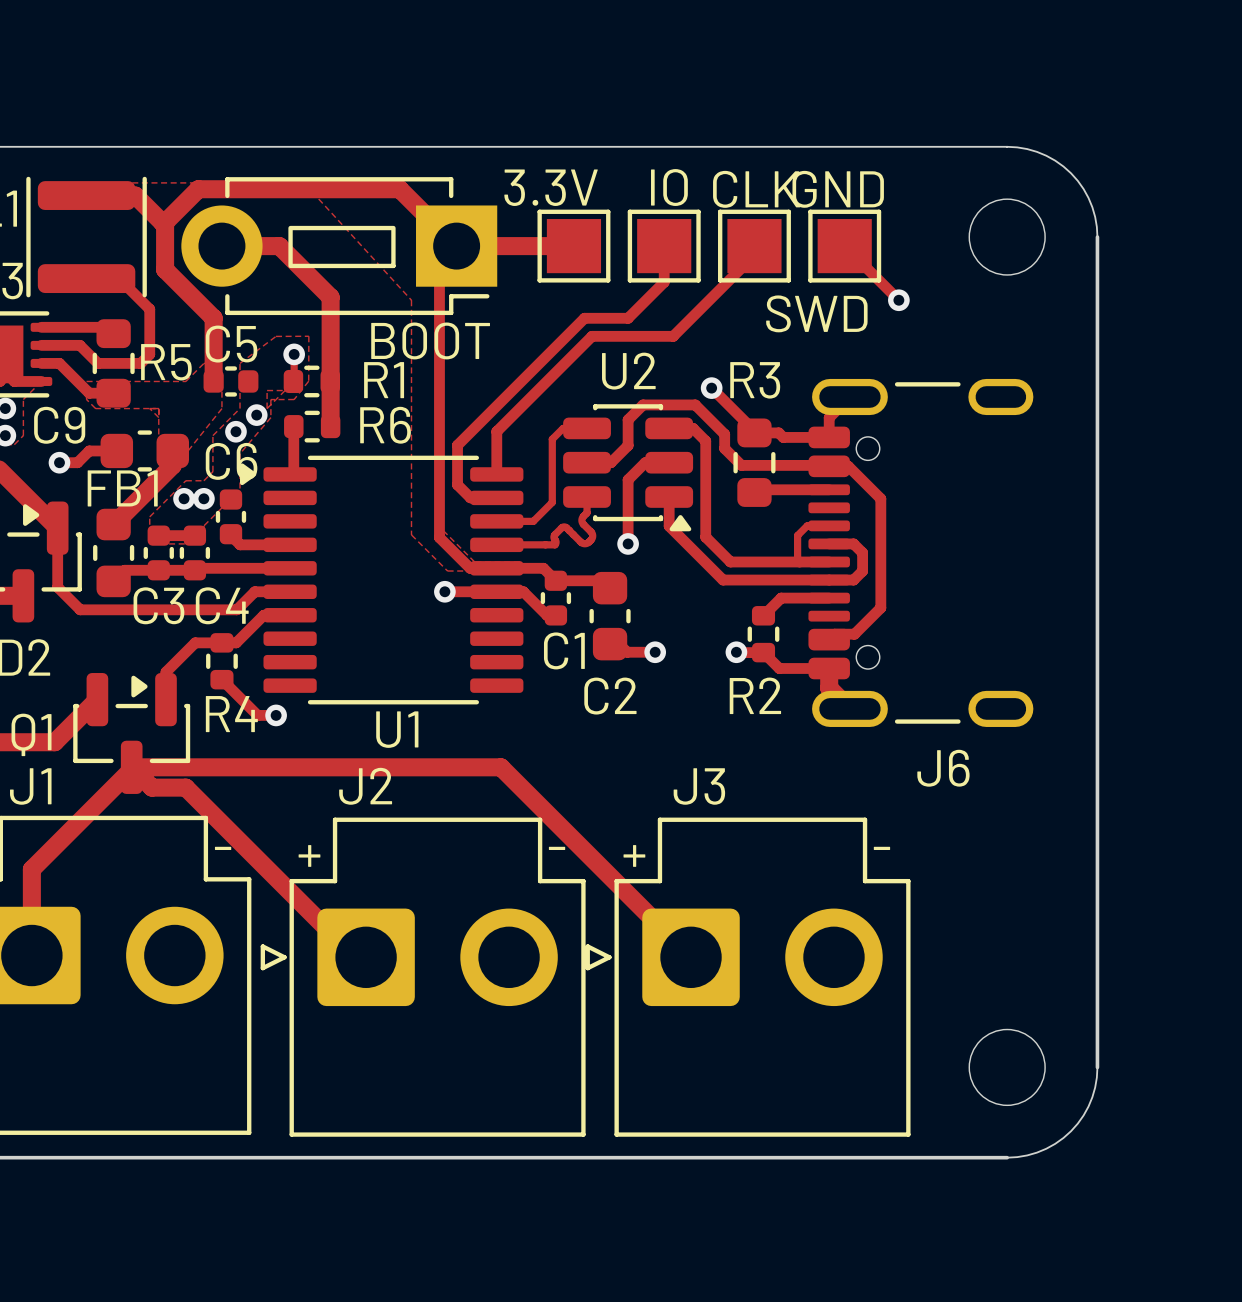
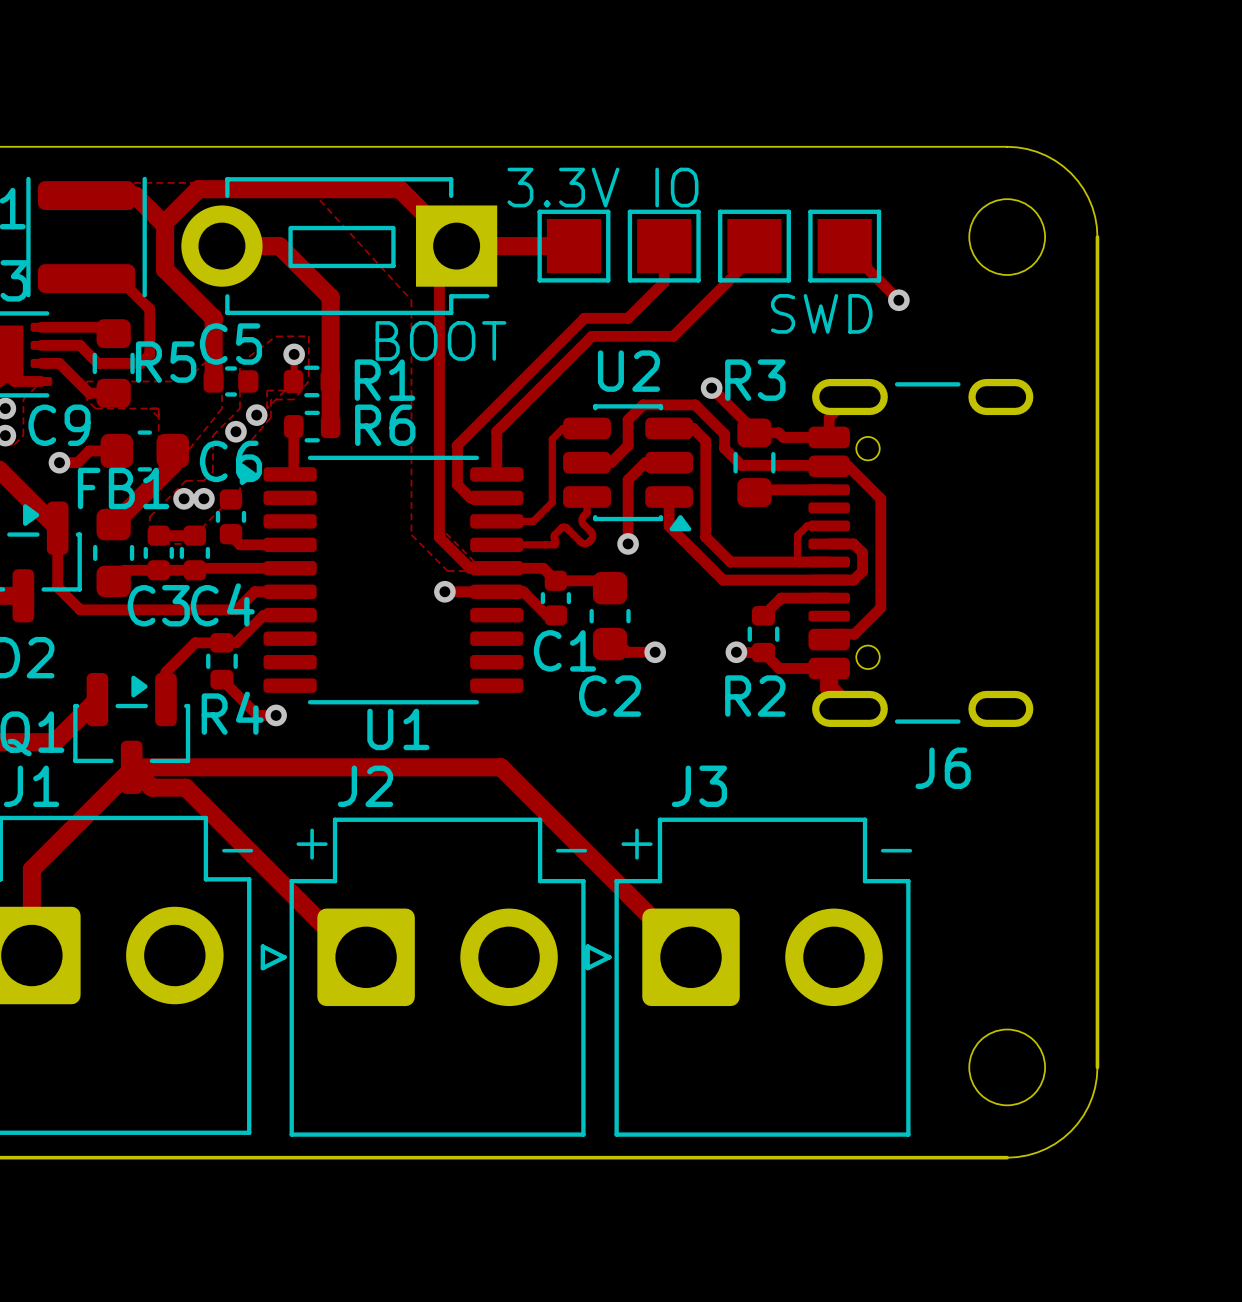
text: CLK (756, 189) -> none
text: GND (838, 189) -> none

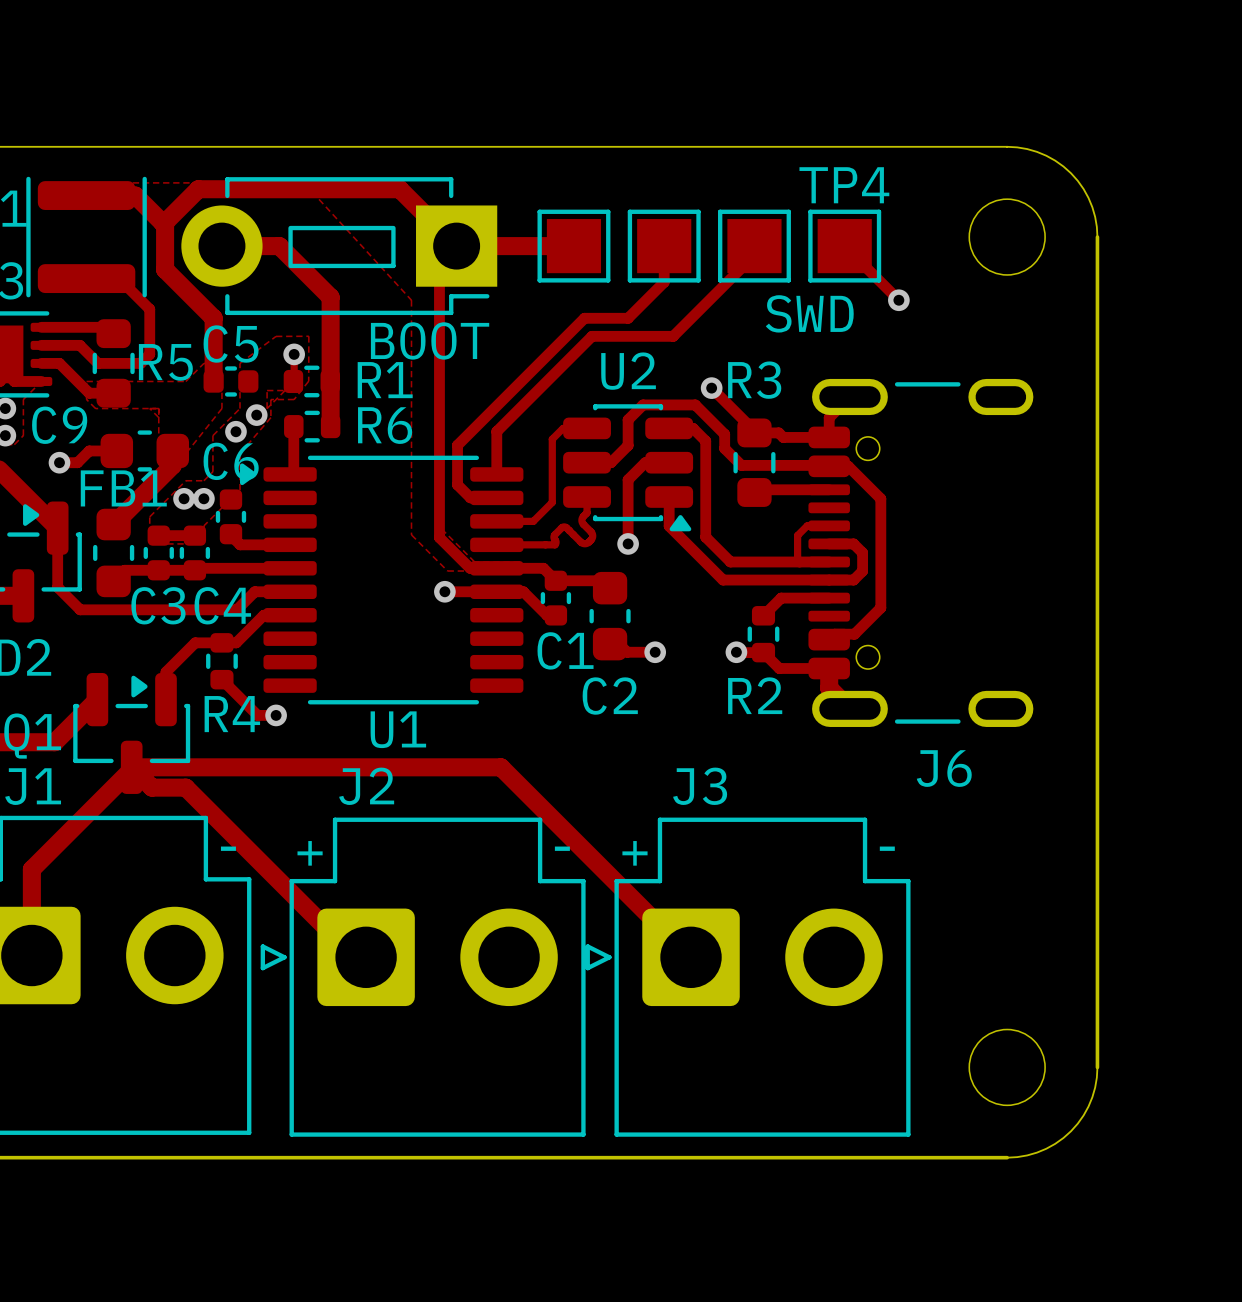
TP4 name: none -> TP4 (844, 185)
text: 3.3V (563, 187) -> none
text: IO (676, 187) -> none

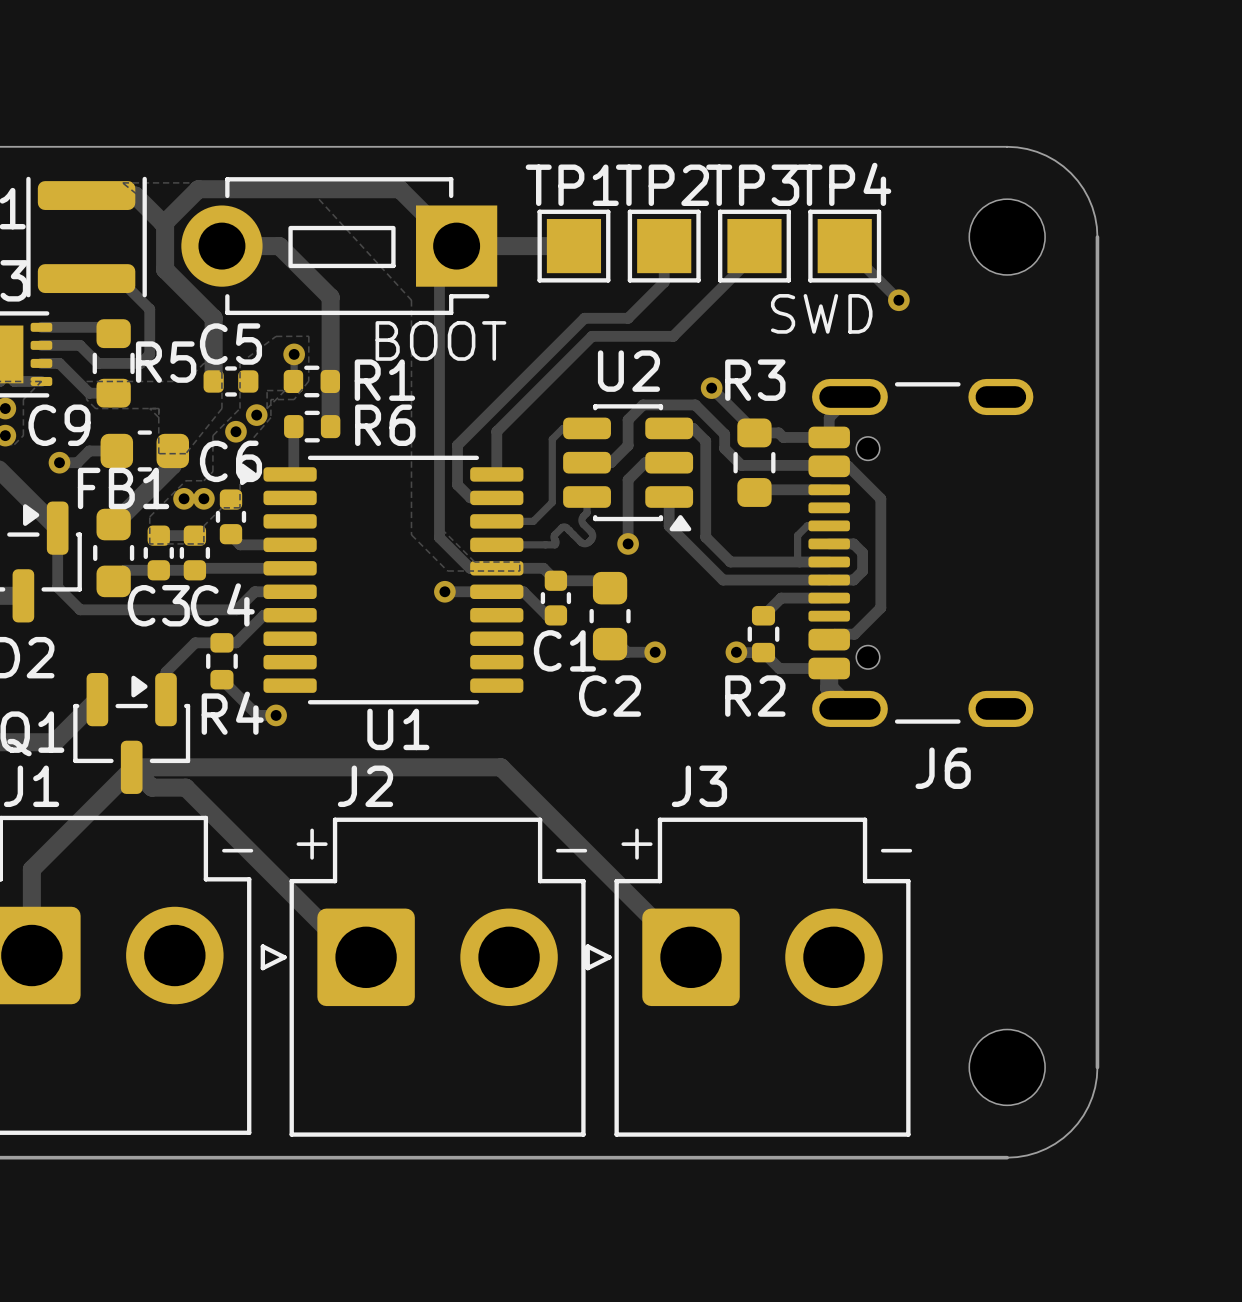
TP2 name: none -> TP2 (662, 185)
TP1 name: none -> TP1 (572, 185)
TP3 name: none -> TP3 (752, 185)

